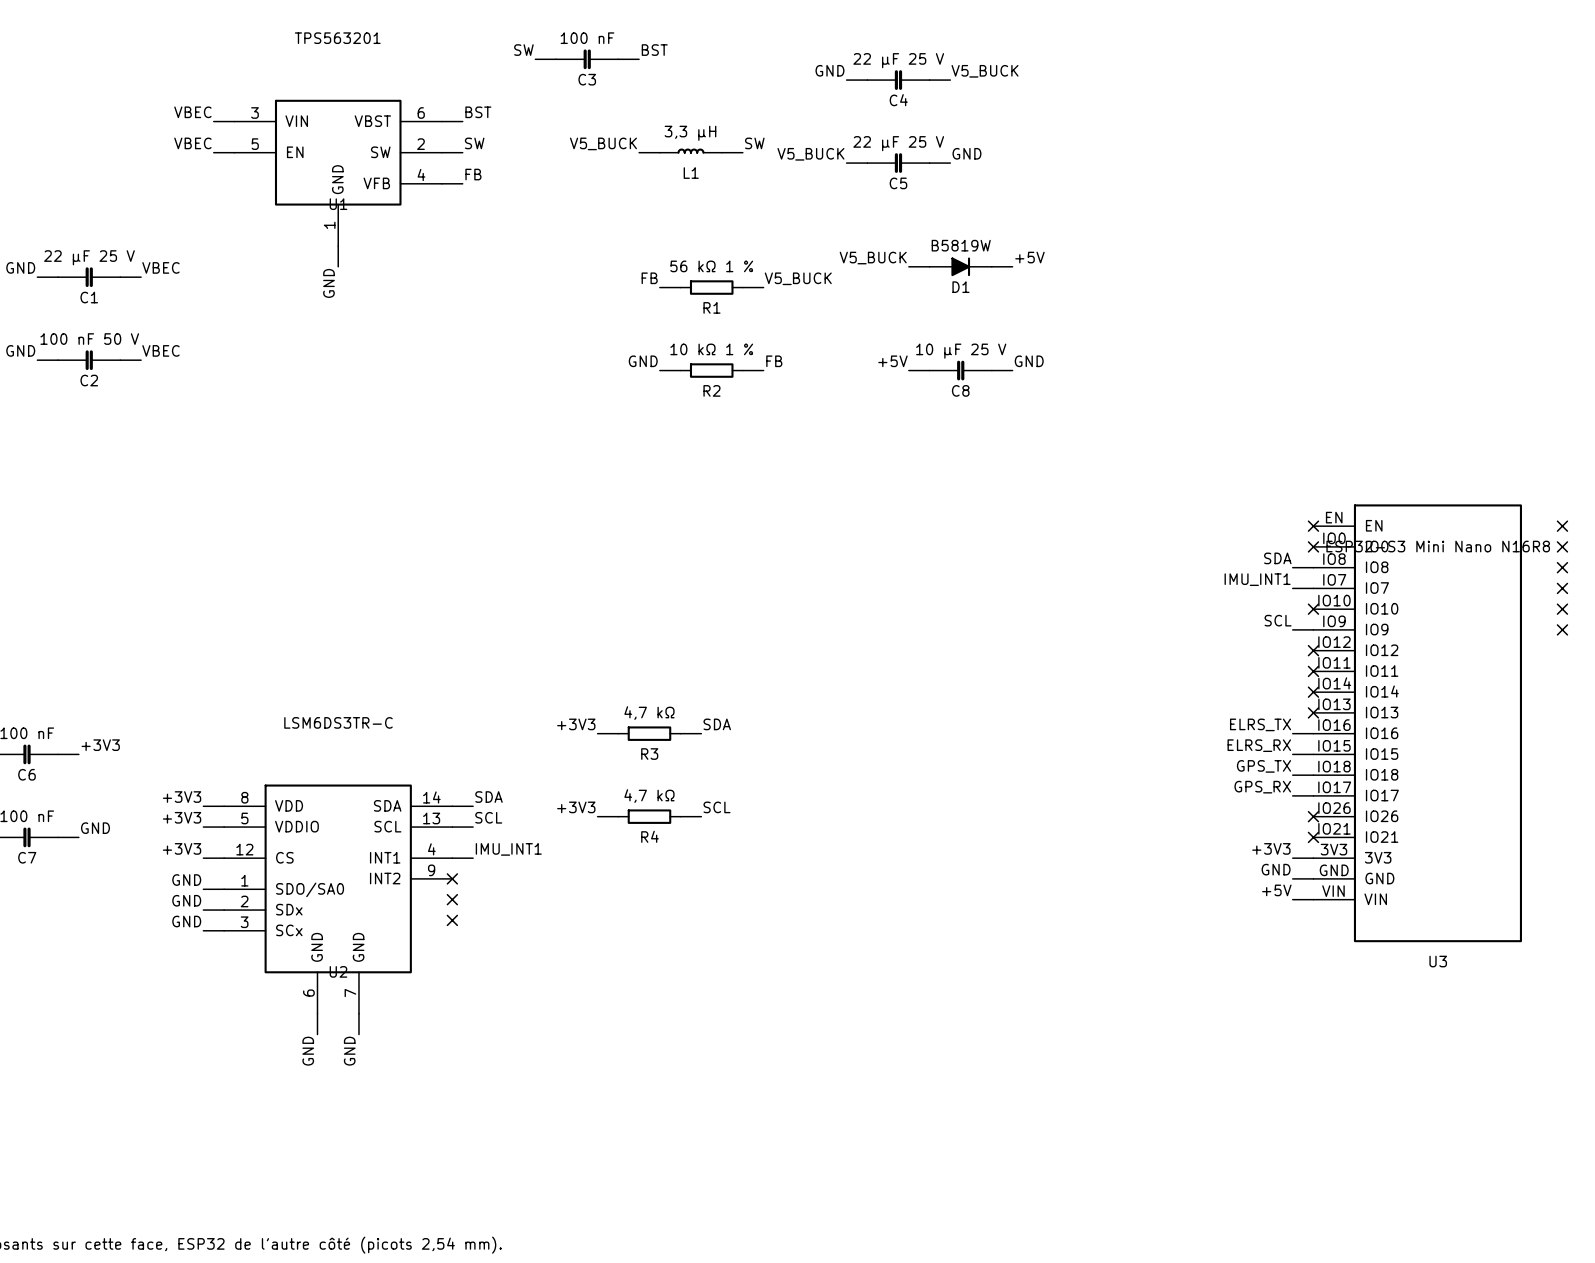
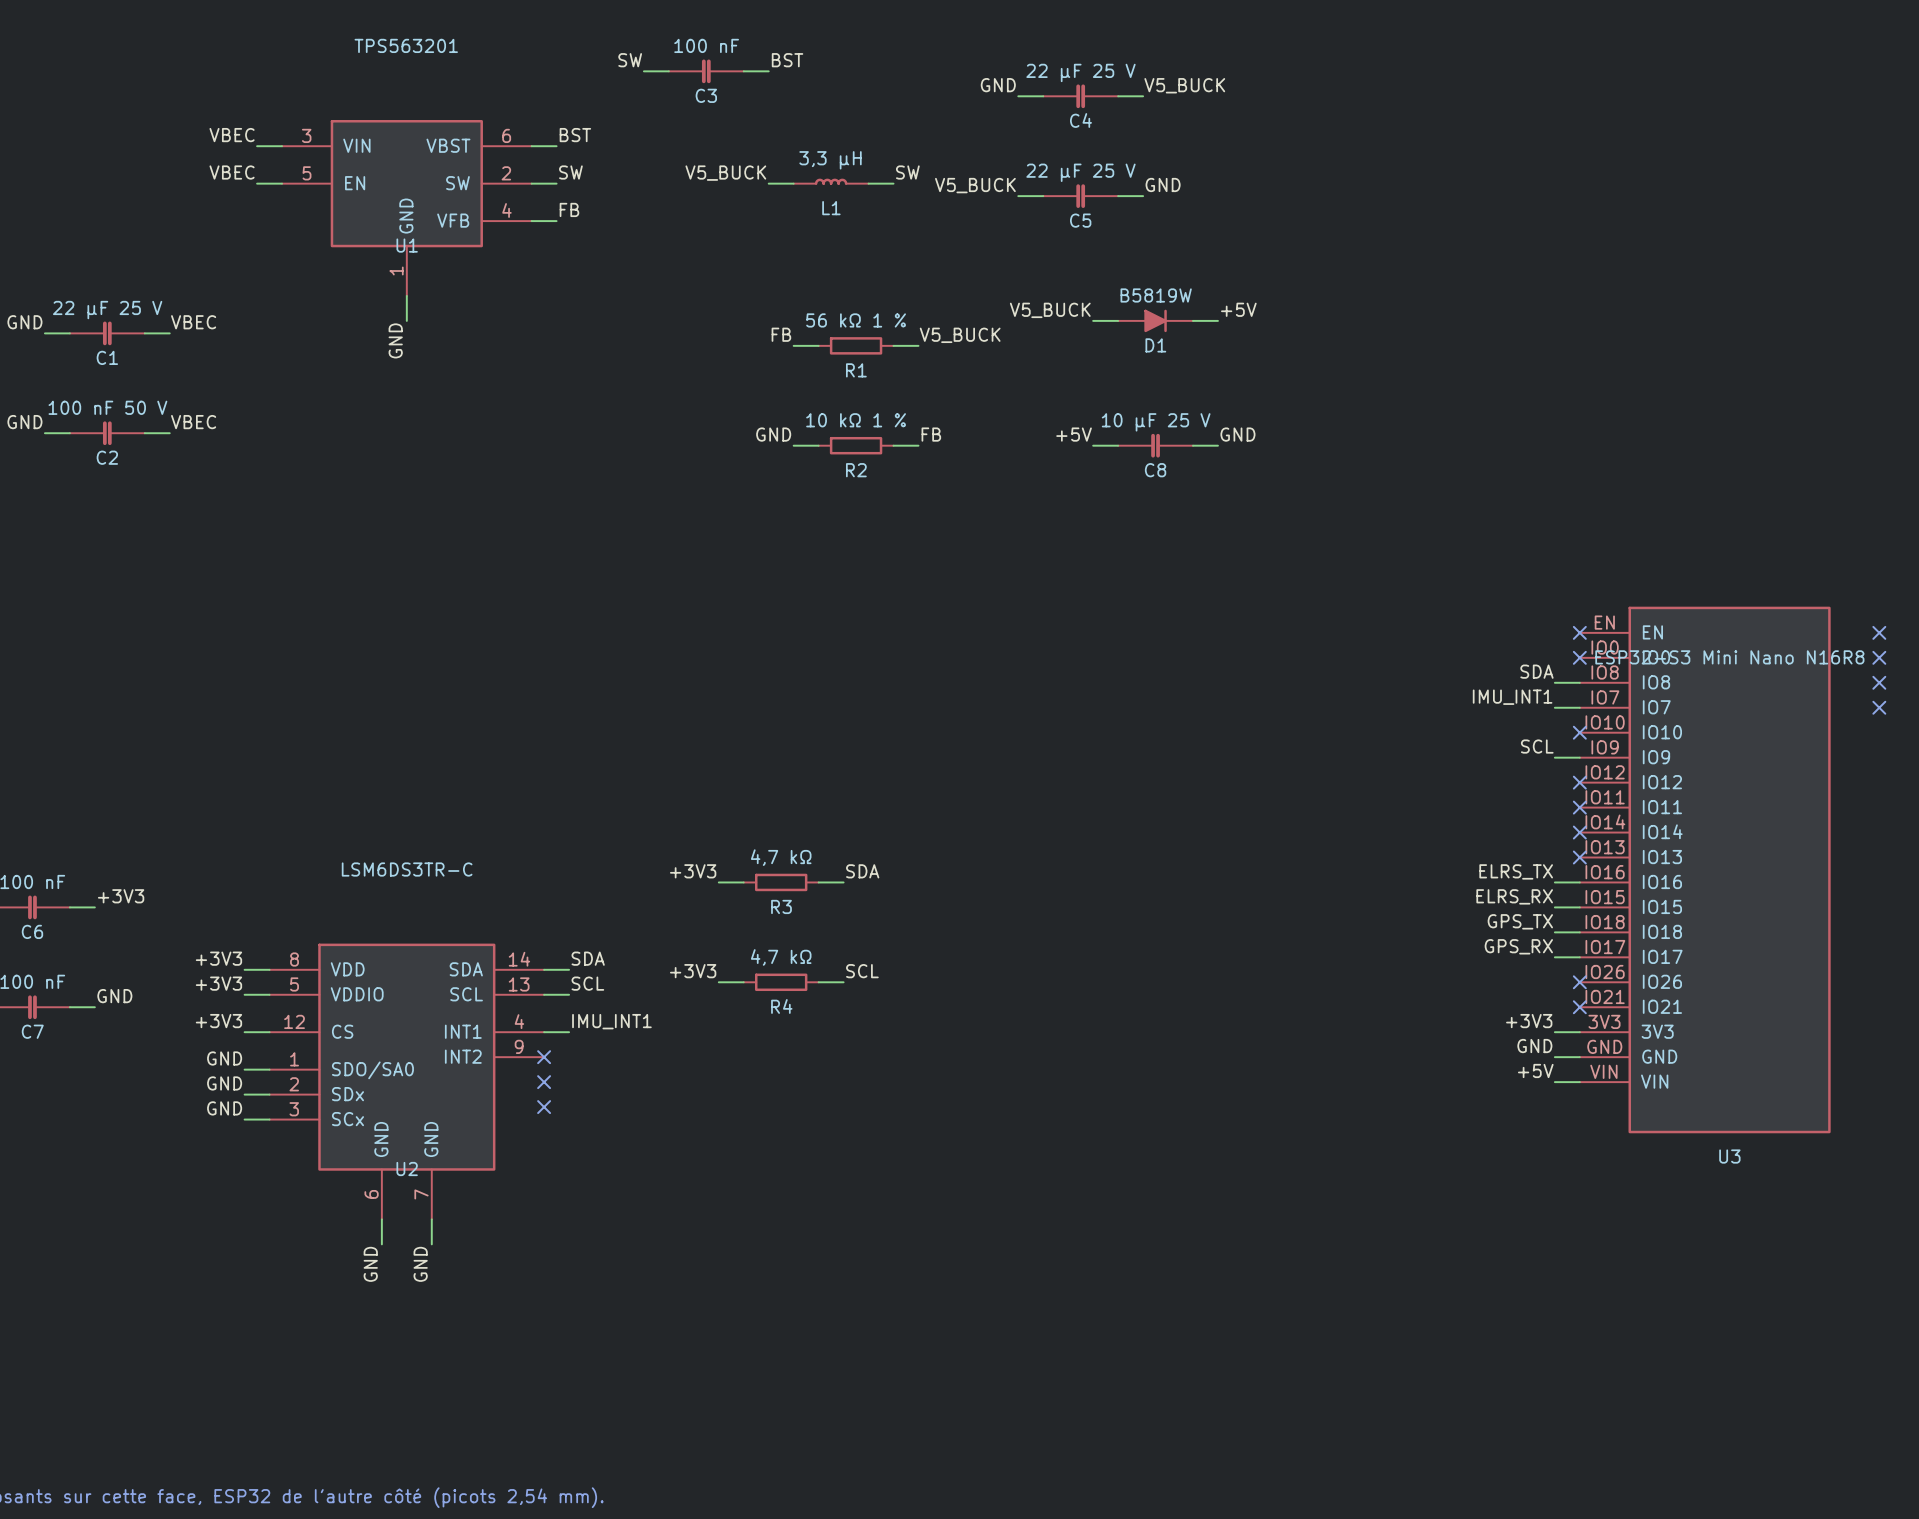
no-connect mark: (1562, 609) -> none
no-connect mark: (1562, 629) -> none

